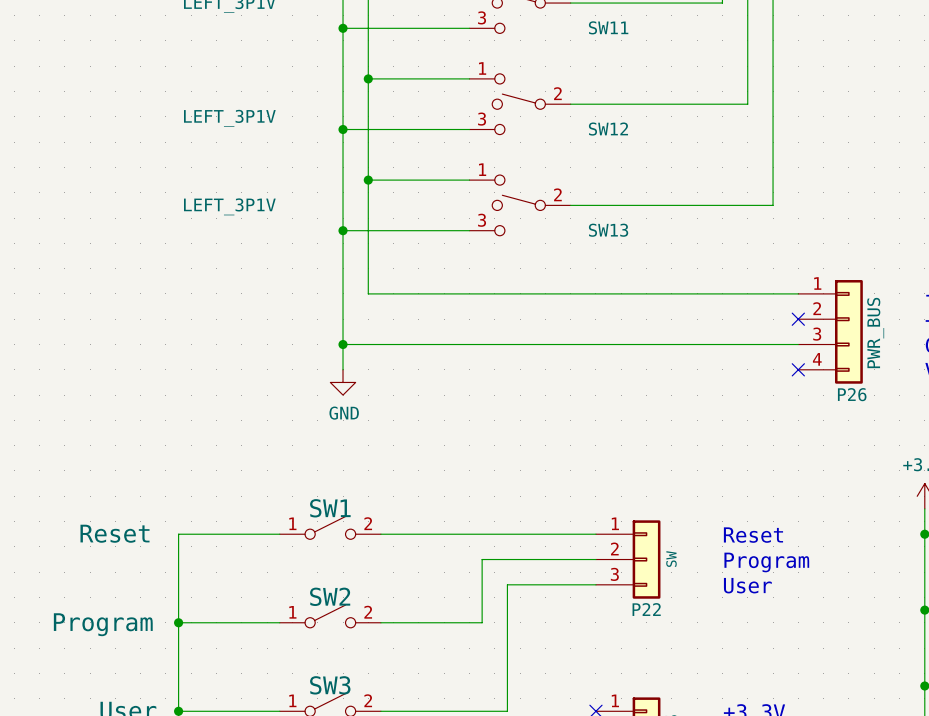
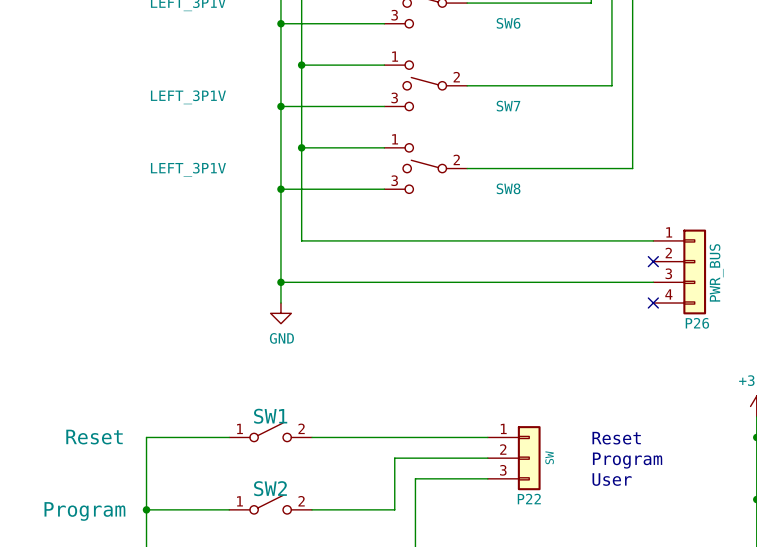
SW11 name: SW11 (608, 27) -> SW6 (508, 23)
SW12 name: SW12 (608, 129) -> SW7 (508, 106)
SW13 name: SW13 (608, 230) -> SW8 (508, 188)

